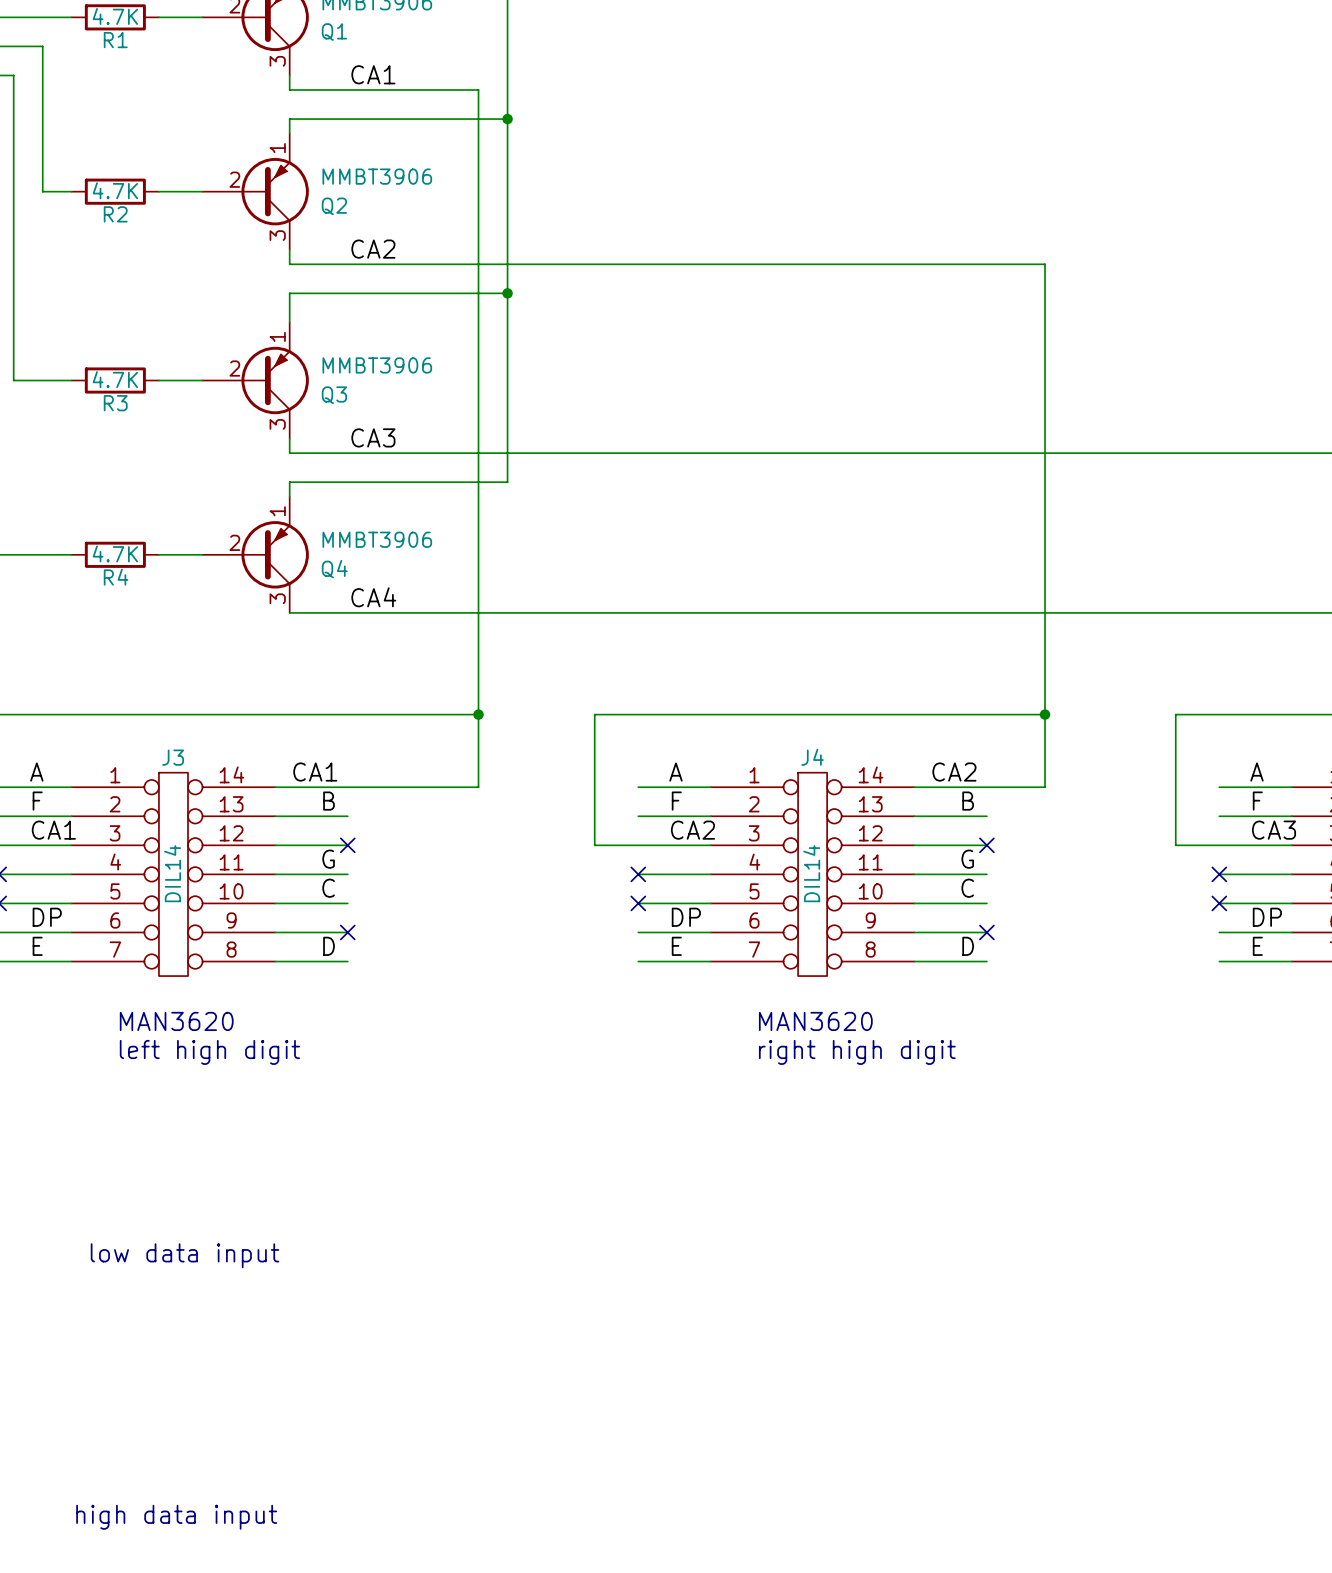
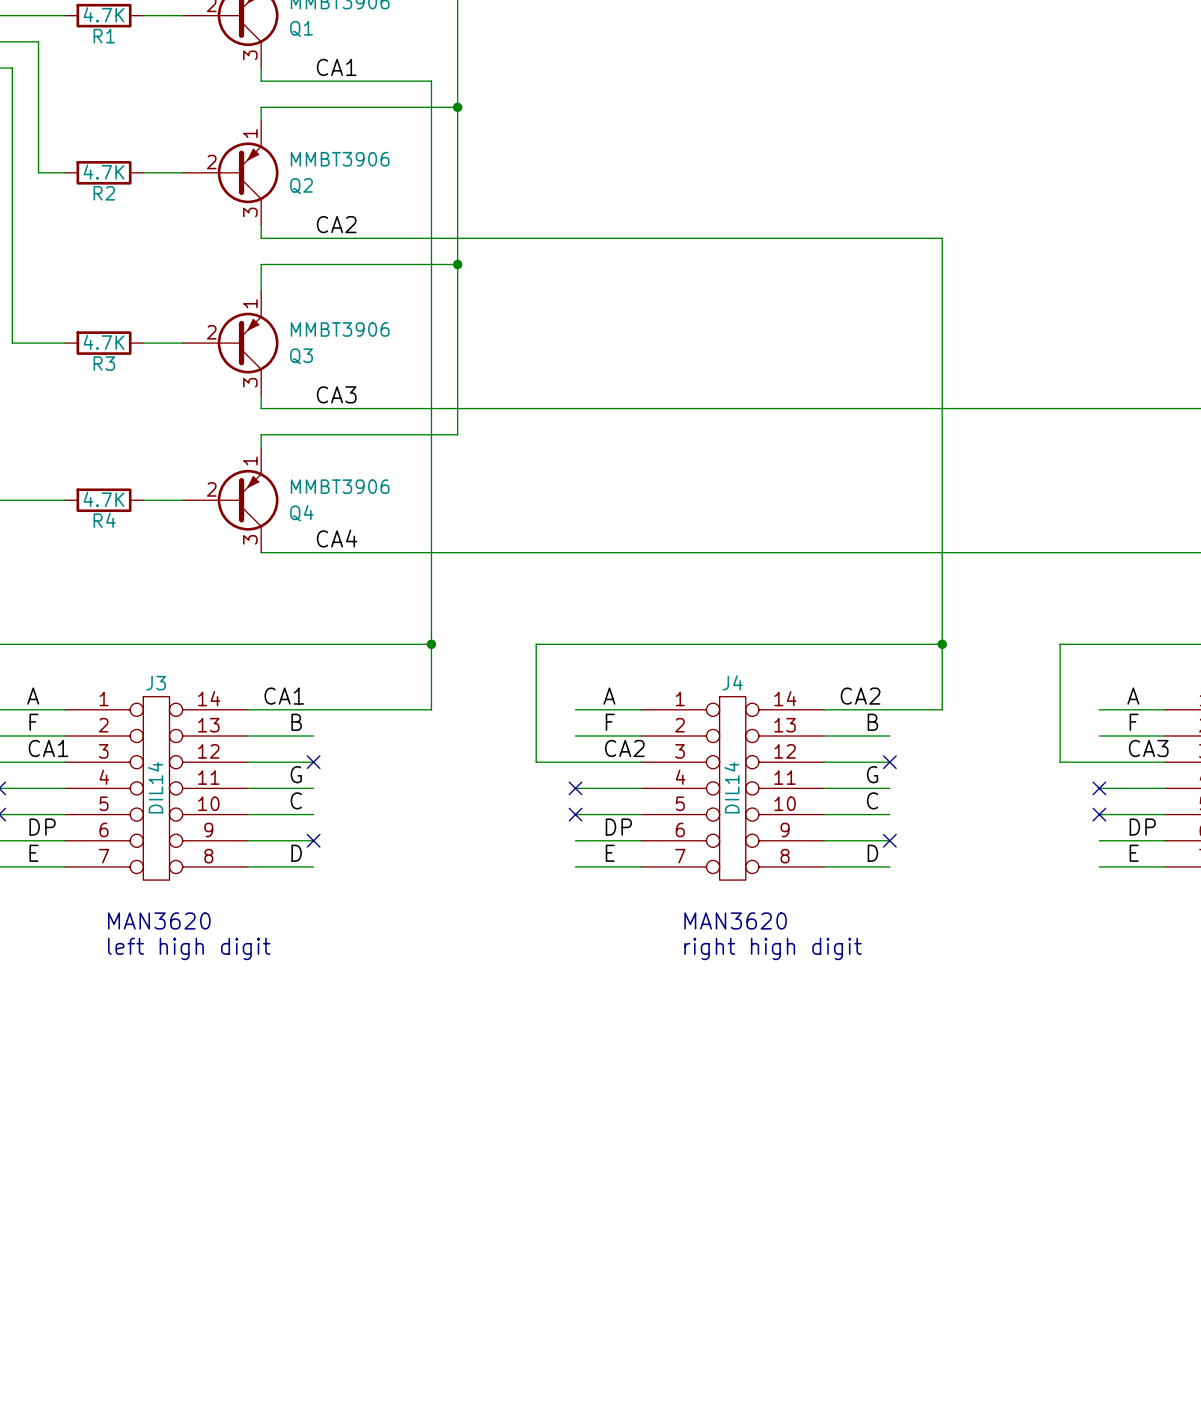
text: low data input (184, 1255) -> none
text: high data input (176, 1517) -> none

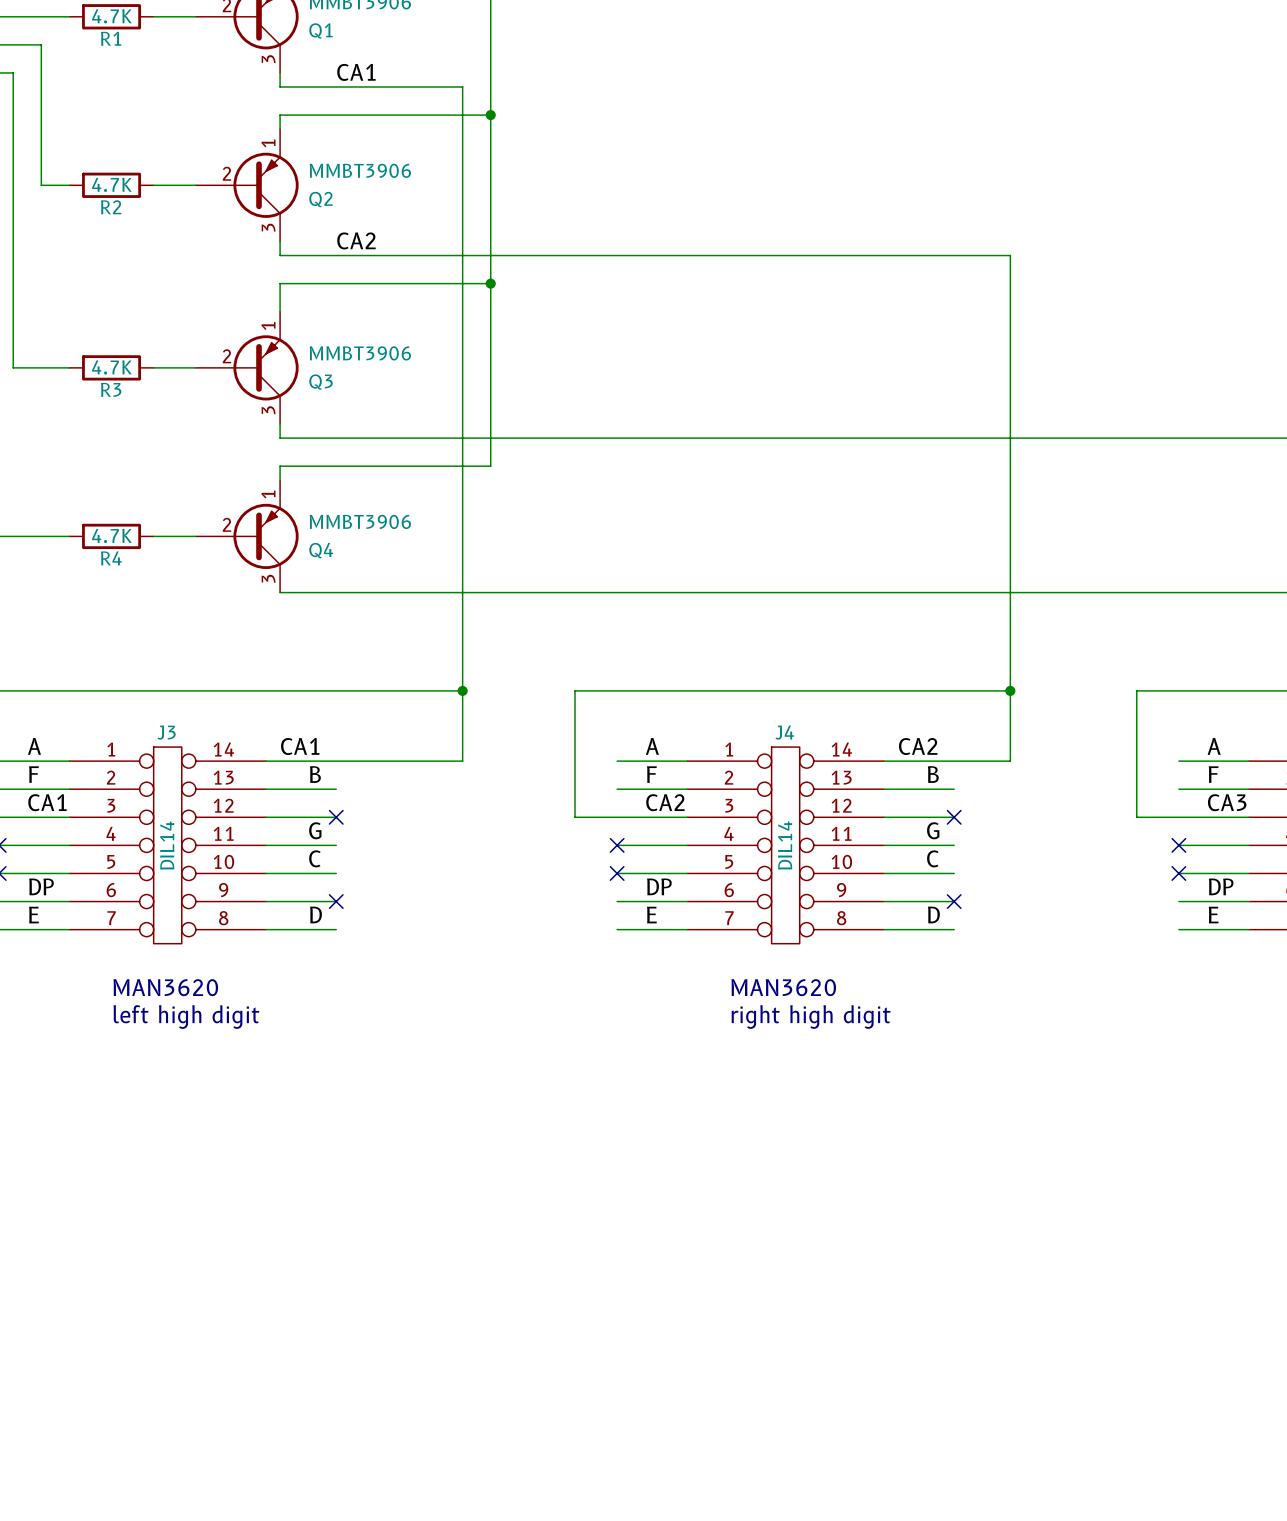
label: CA3 (336, 394) -> none
label: CA4 (337, 538) -> none

